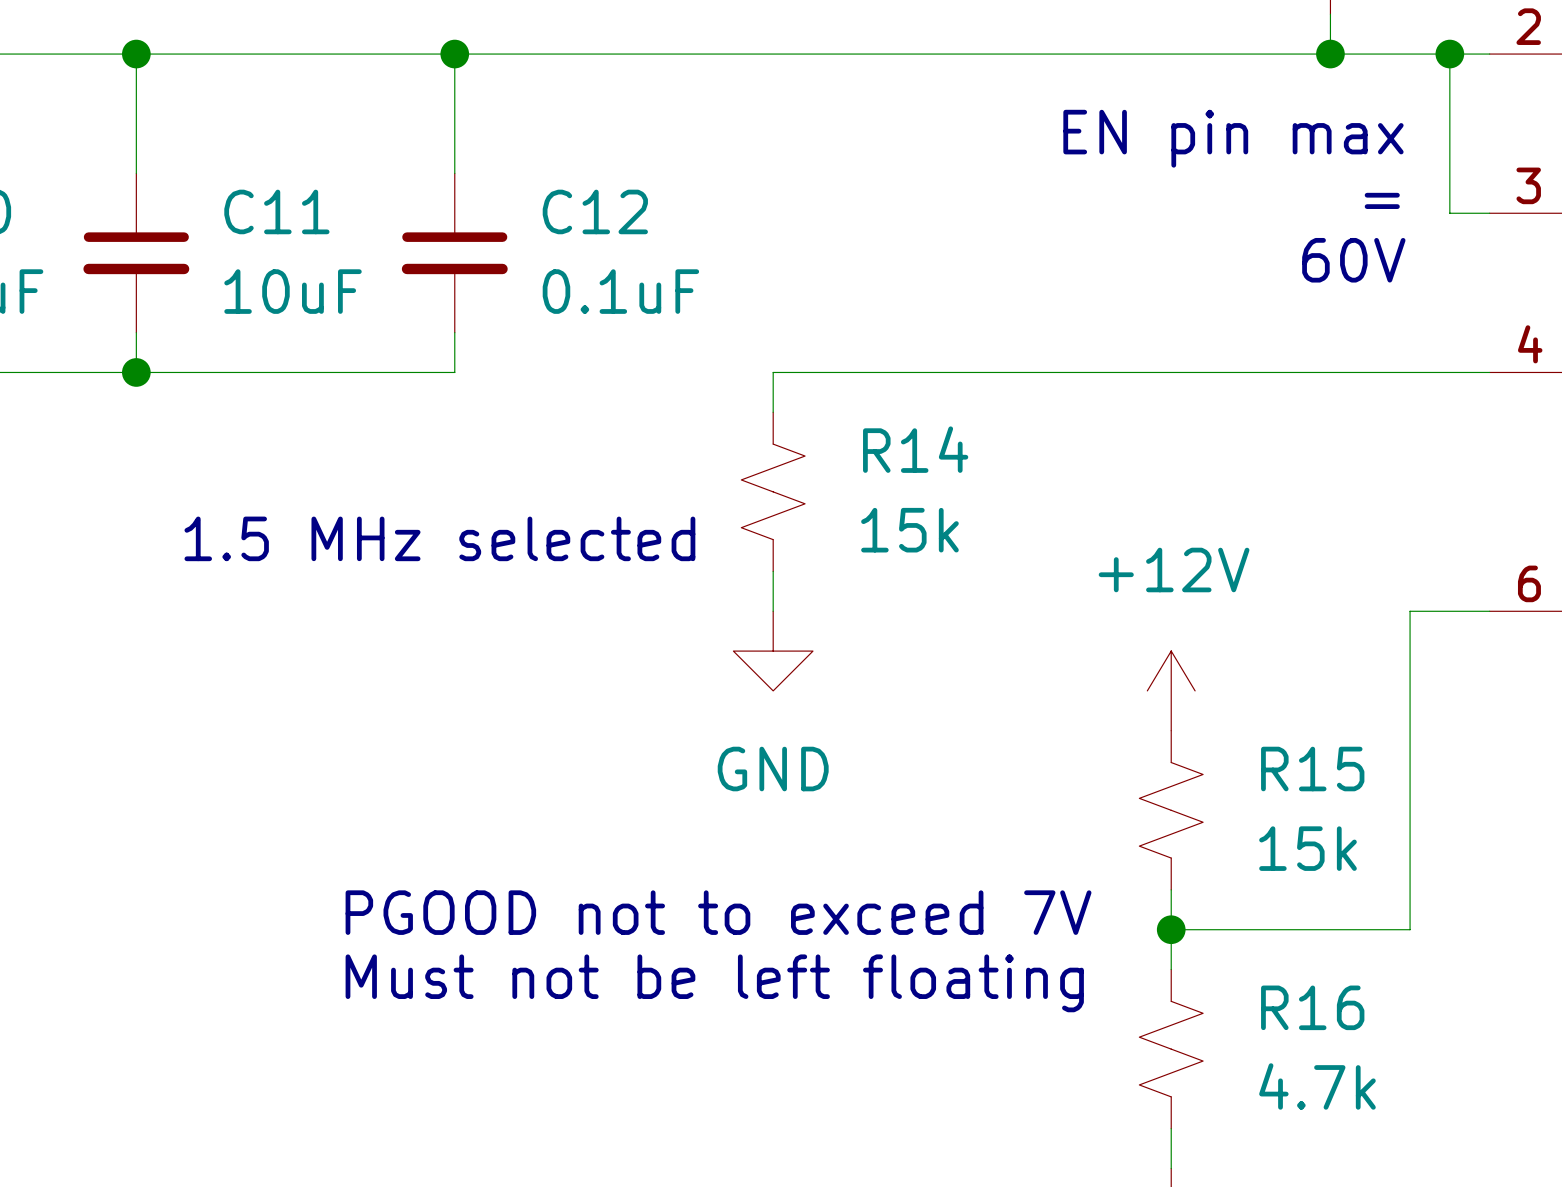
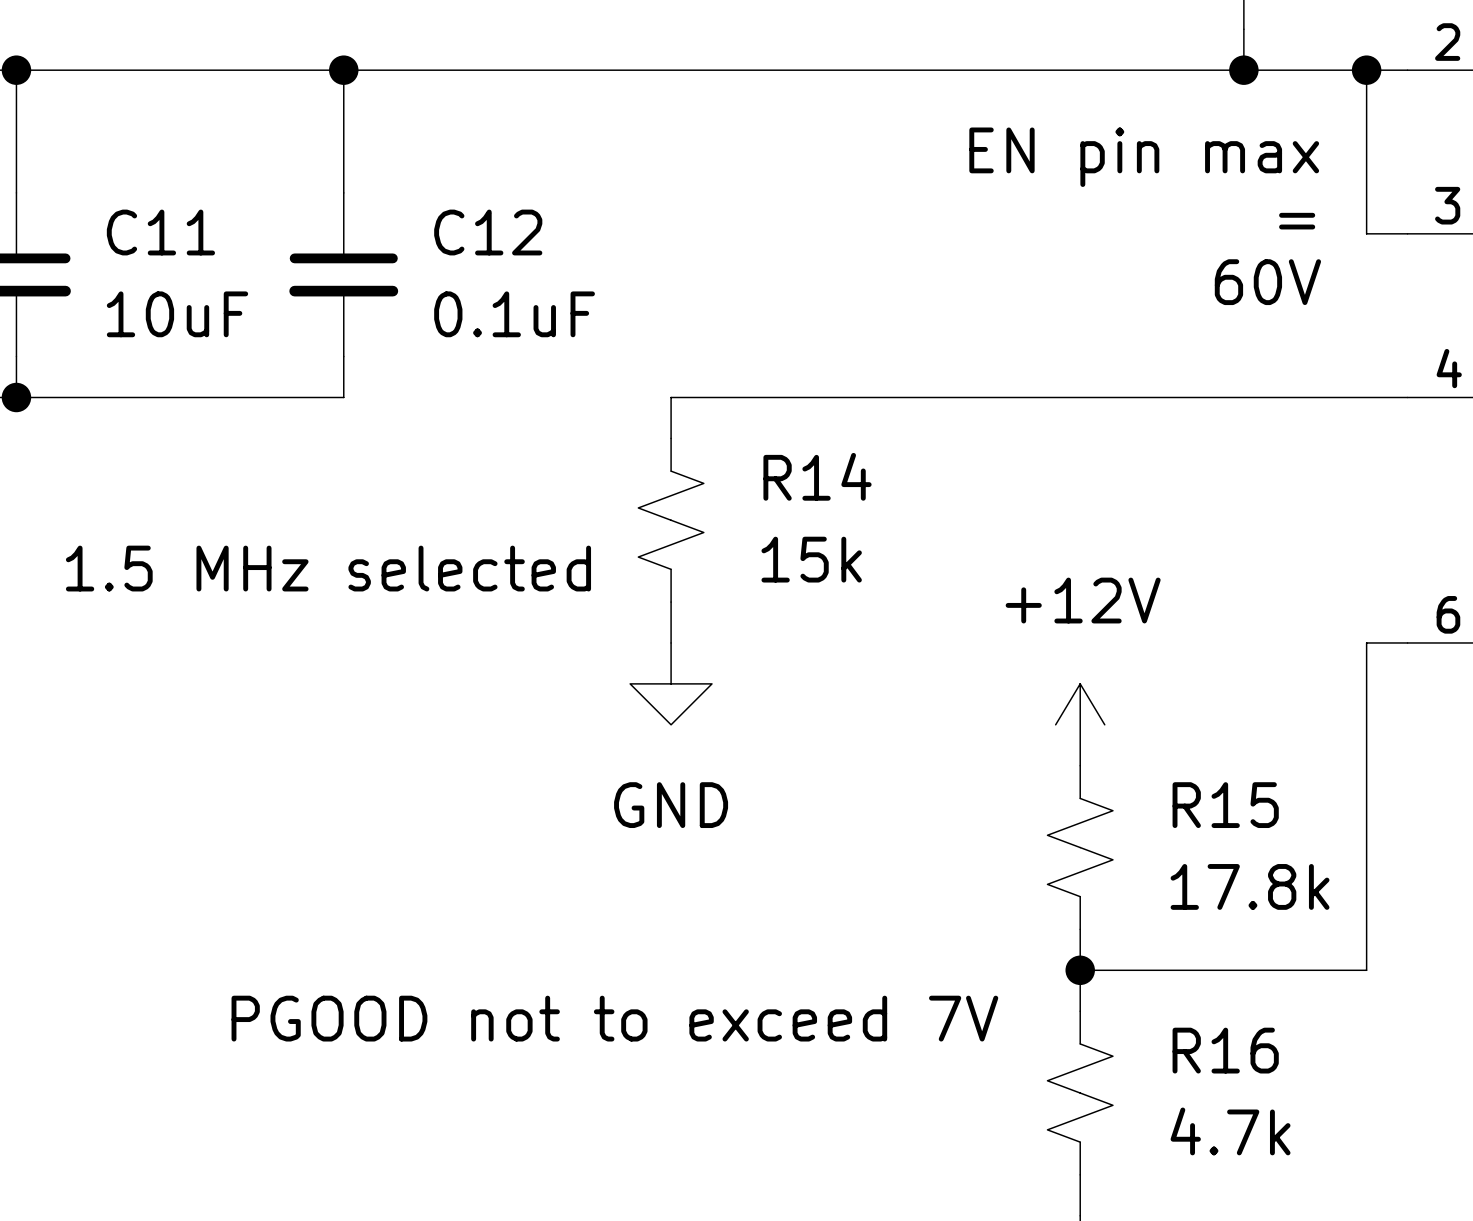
wire: (1449, 611) (1410, 611) (1410, 929) -> (1366, 642) (1366, 970) (1325, 970)
R15 value: 15k (1307, 848) -> 17.8k (1250, 886)
text: PGOOD not to exceed 7V (718, 912) -> none
text: Must not be left floating (714, 983) -> PGOOD not to exceed 7V (614, 1018)

